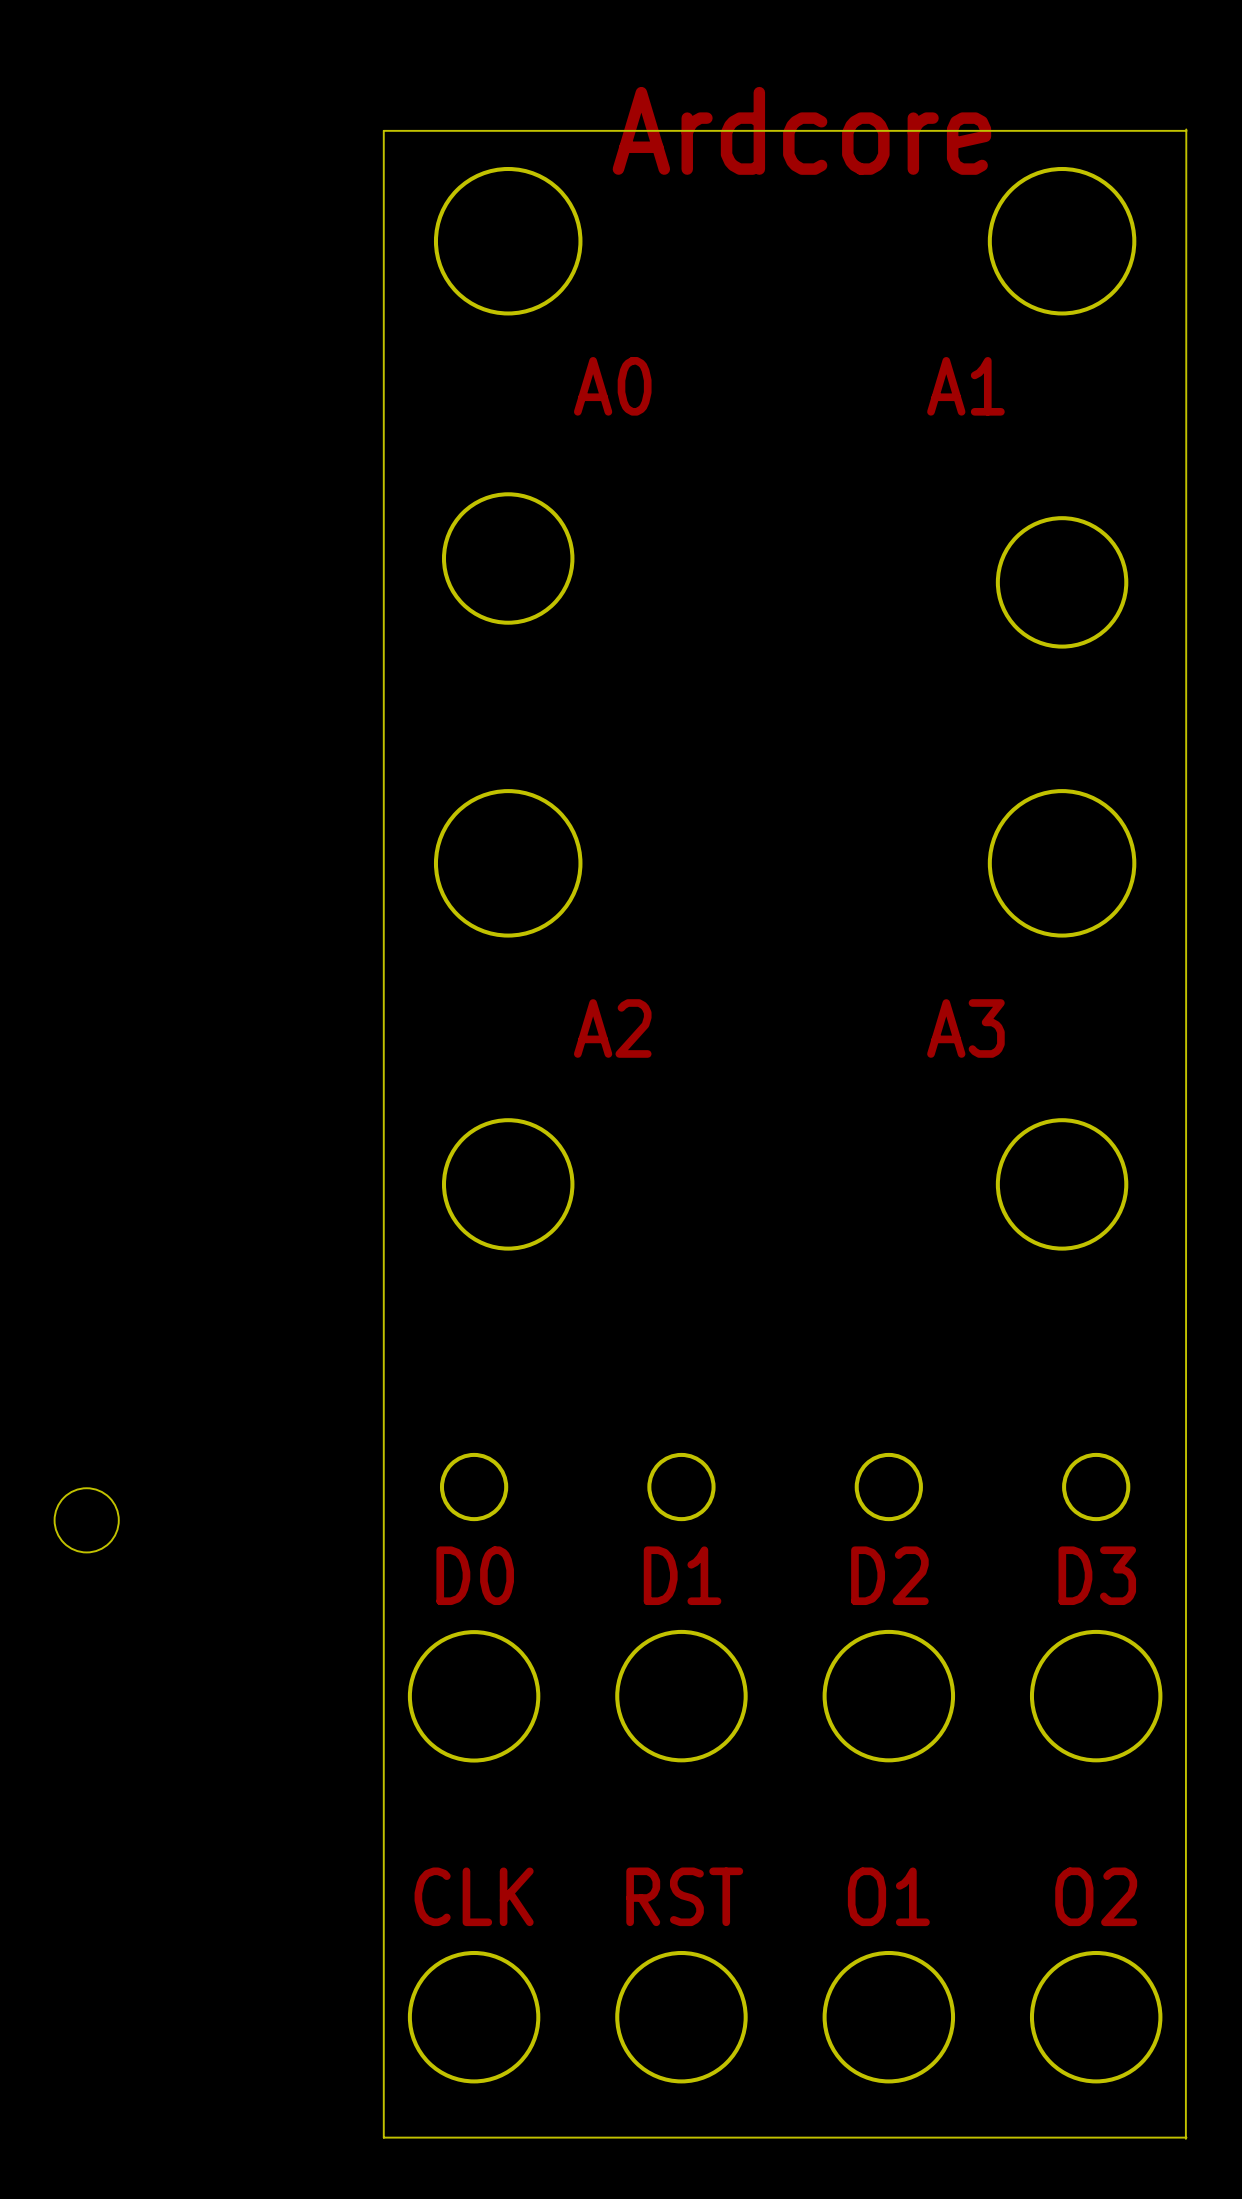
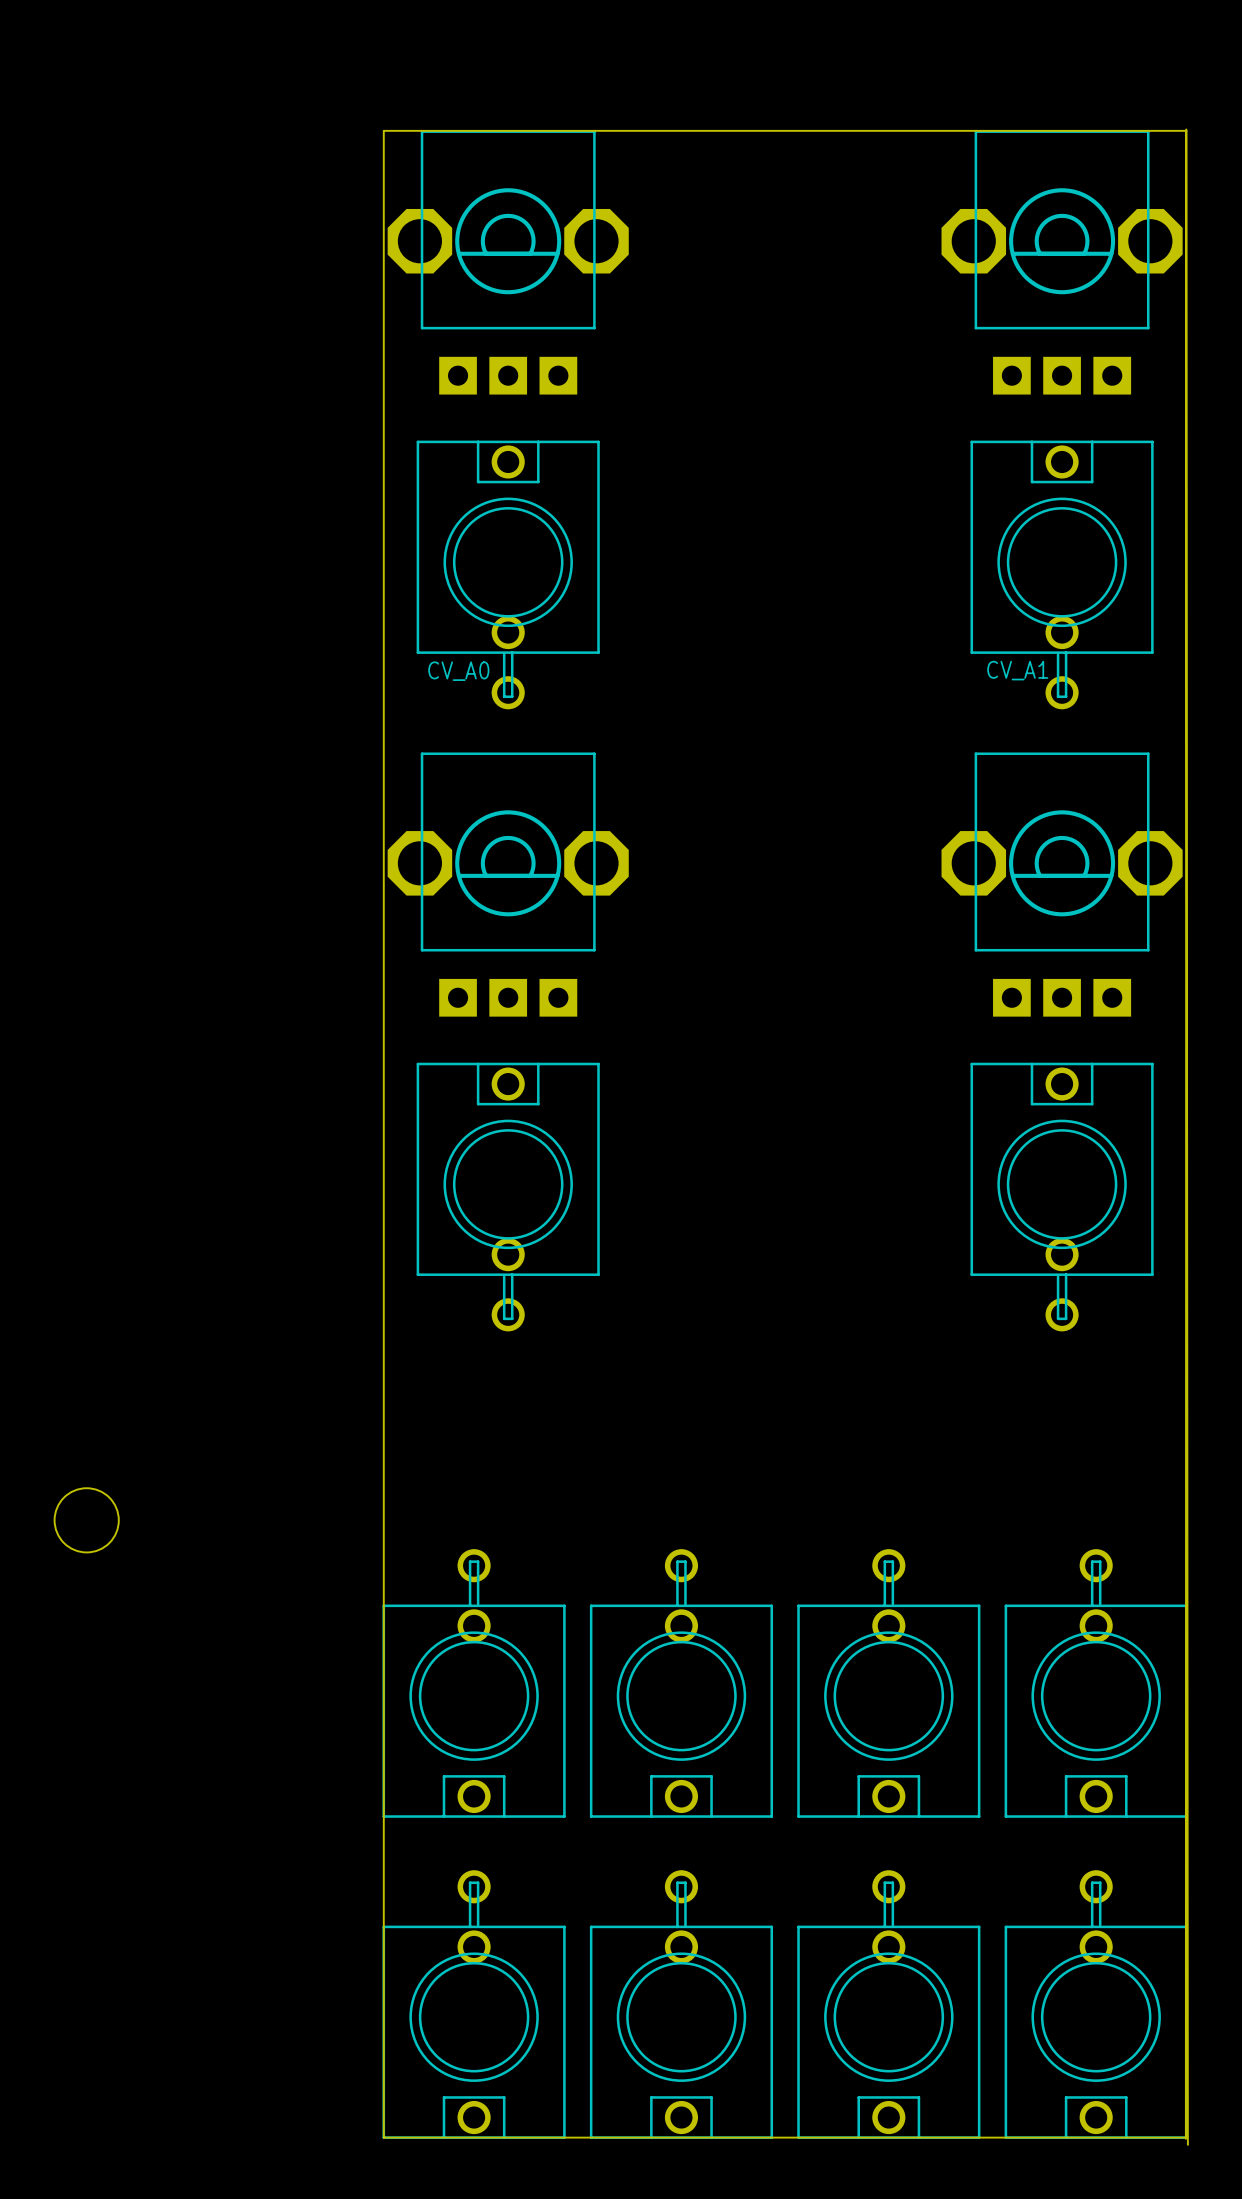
text: Ardcore (801, 130) -> none
board edge: none -> (1186, 131) (1187, 2144)
round board edge: [433, 166, 583, 316] -> none
round board edge: [987, 166, 1137, 316] -> none
part: none -> (508, 262)
part: none -> (1062, 262)
text: A0 (612, 386) -> none
text: A1 (965, 386) -> none
round board edge: [441, 492, 575, 625] -> none
round board edge: [995, 516, 1129, 649] -> none
CV_A0: none -> (508, 574)
CV_A1: none -> (1062, 574)
round board edge: [433, 789, 583, 938] -> none
round board edge: [987, 789, 1137, 938] -> none
part: none -> (508, 884)
part: none -> (1062, 884)
text: A2 (612, 1028) -> none
text: A3 (965, 1028) -> none
round board edge: [441, 1118, 575, 1251] -> none
round board edge: [995, 1118, 1129, 1251] -> none
part: none -> (508, 1197)
part: none -> (1062, 1197)
round board edge: [439, 1452, 509, 1522] -> none
round board edge: [647, 1452, 716, 1522] -> none
round board edge: [854, 1452, 923, 1522] -> none
round board edge: [1062, 1452, 1131, 1522] -> none
text: D0 (475, 1575) -> none
text: D1 (682, 1575) -> none
text: D2 (889, 1575) -> none
text: D3 (1097, 1575) -> none
round board edge: [615, 1629, 748, 1763] -> none
round board edge: [822, 1629, 956, 1763] -> none
round board edge: [1029, 1629, 1163, 1763] -> none
round board edge: [407, 1630, 541, 1763] -> none
part: none -> (474, 1683)
part: none -> (681, 1683)
part: none -> (888, 1683)
part: none -> (1096, 1683)
text: CLK (474, 1896) -> none
text: RST (684, 1896) -> none
text: O1 (888, 1896) -> none
text: O2 (1096, 1896) -> none
round board edge: [407, 1950, 541, 2084] -> none
round board edge: [615, 1950, 748, 2084] -> none
round board edge: [822, 1950, 956, 2084] -> none
round board edge: [1029, 1950, 1163, 2084] -> none
part: none -> (474, 2004)
part: none -> (681, 2004)
part: none -> (888, 2004)
part: none -> (1096, 2004)

